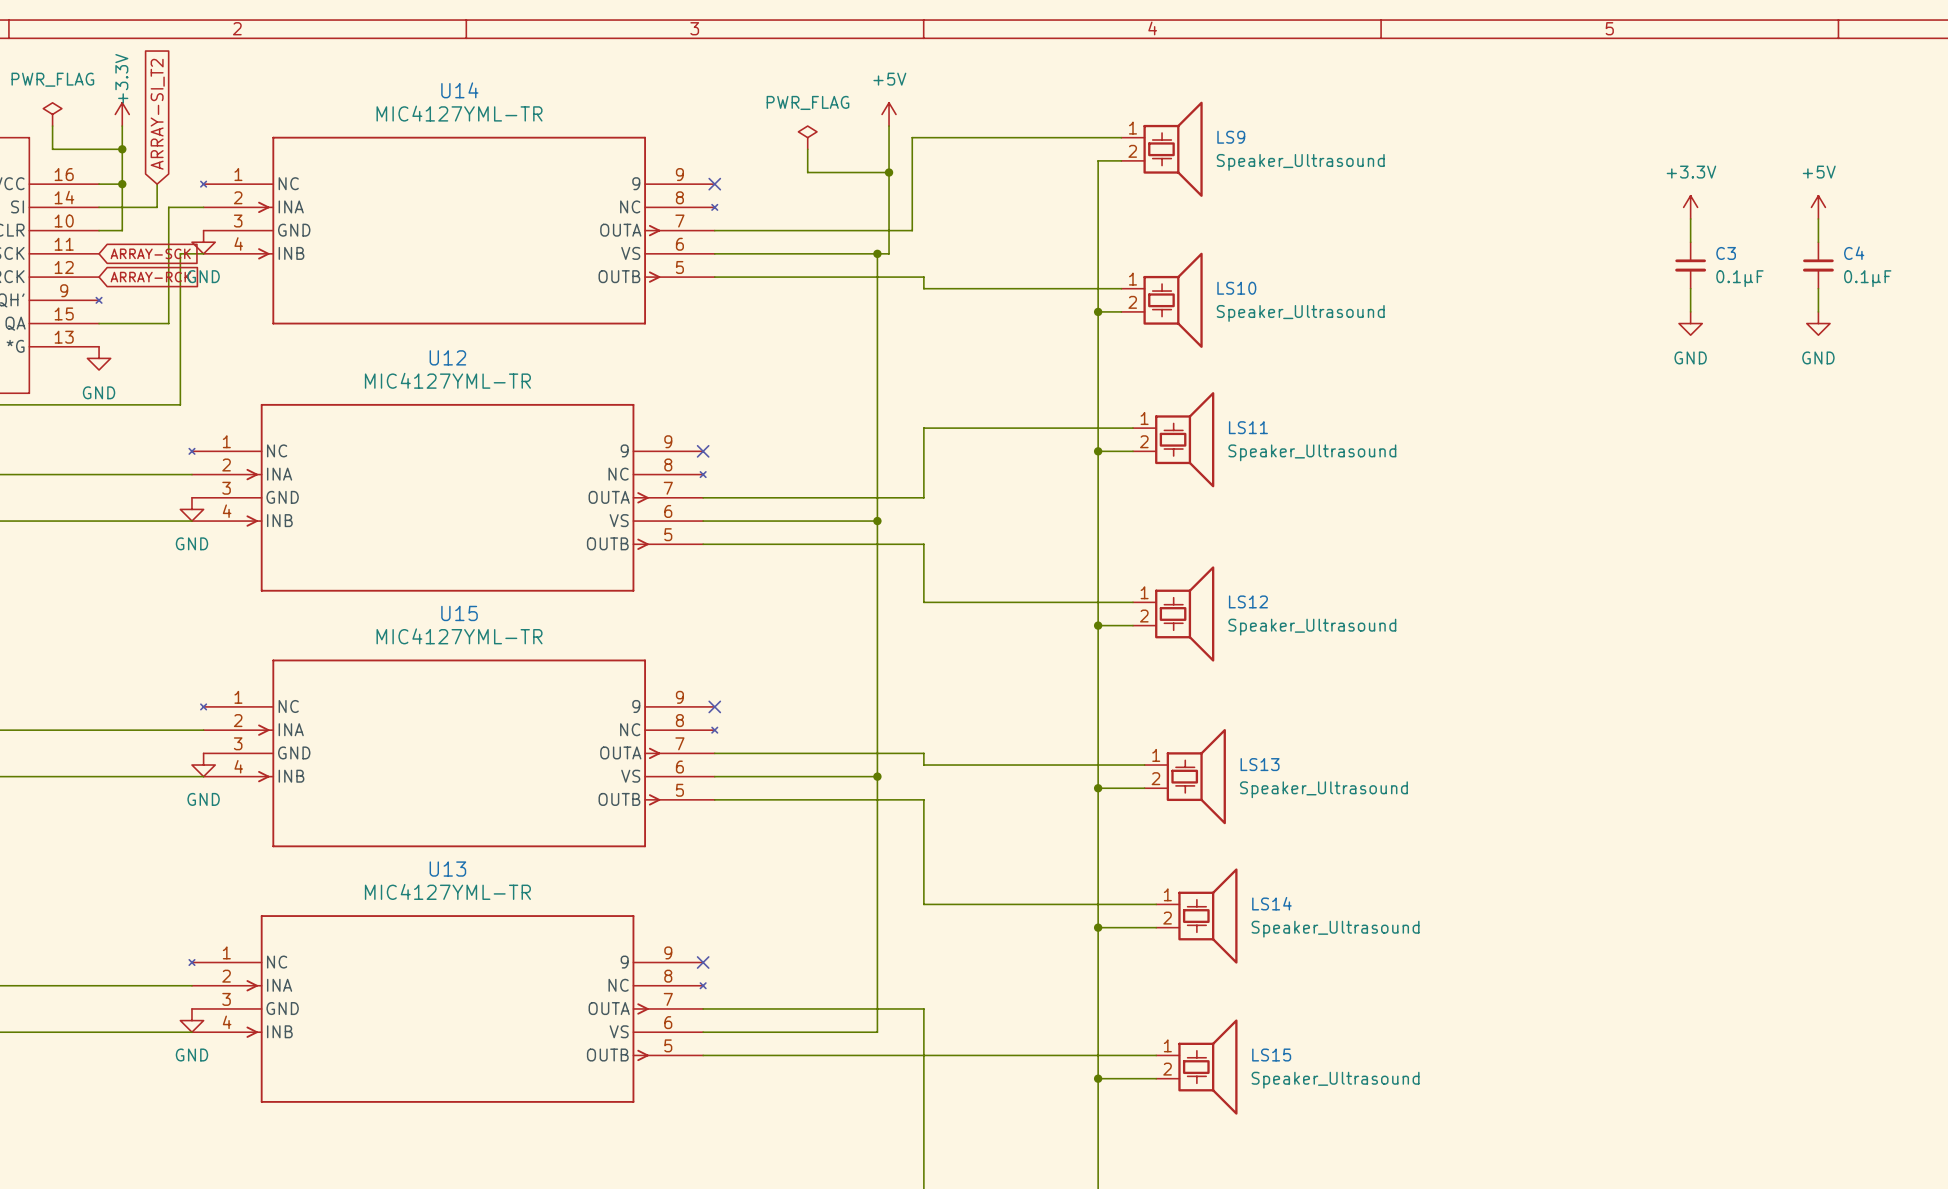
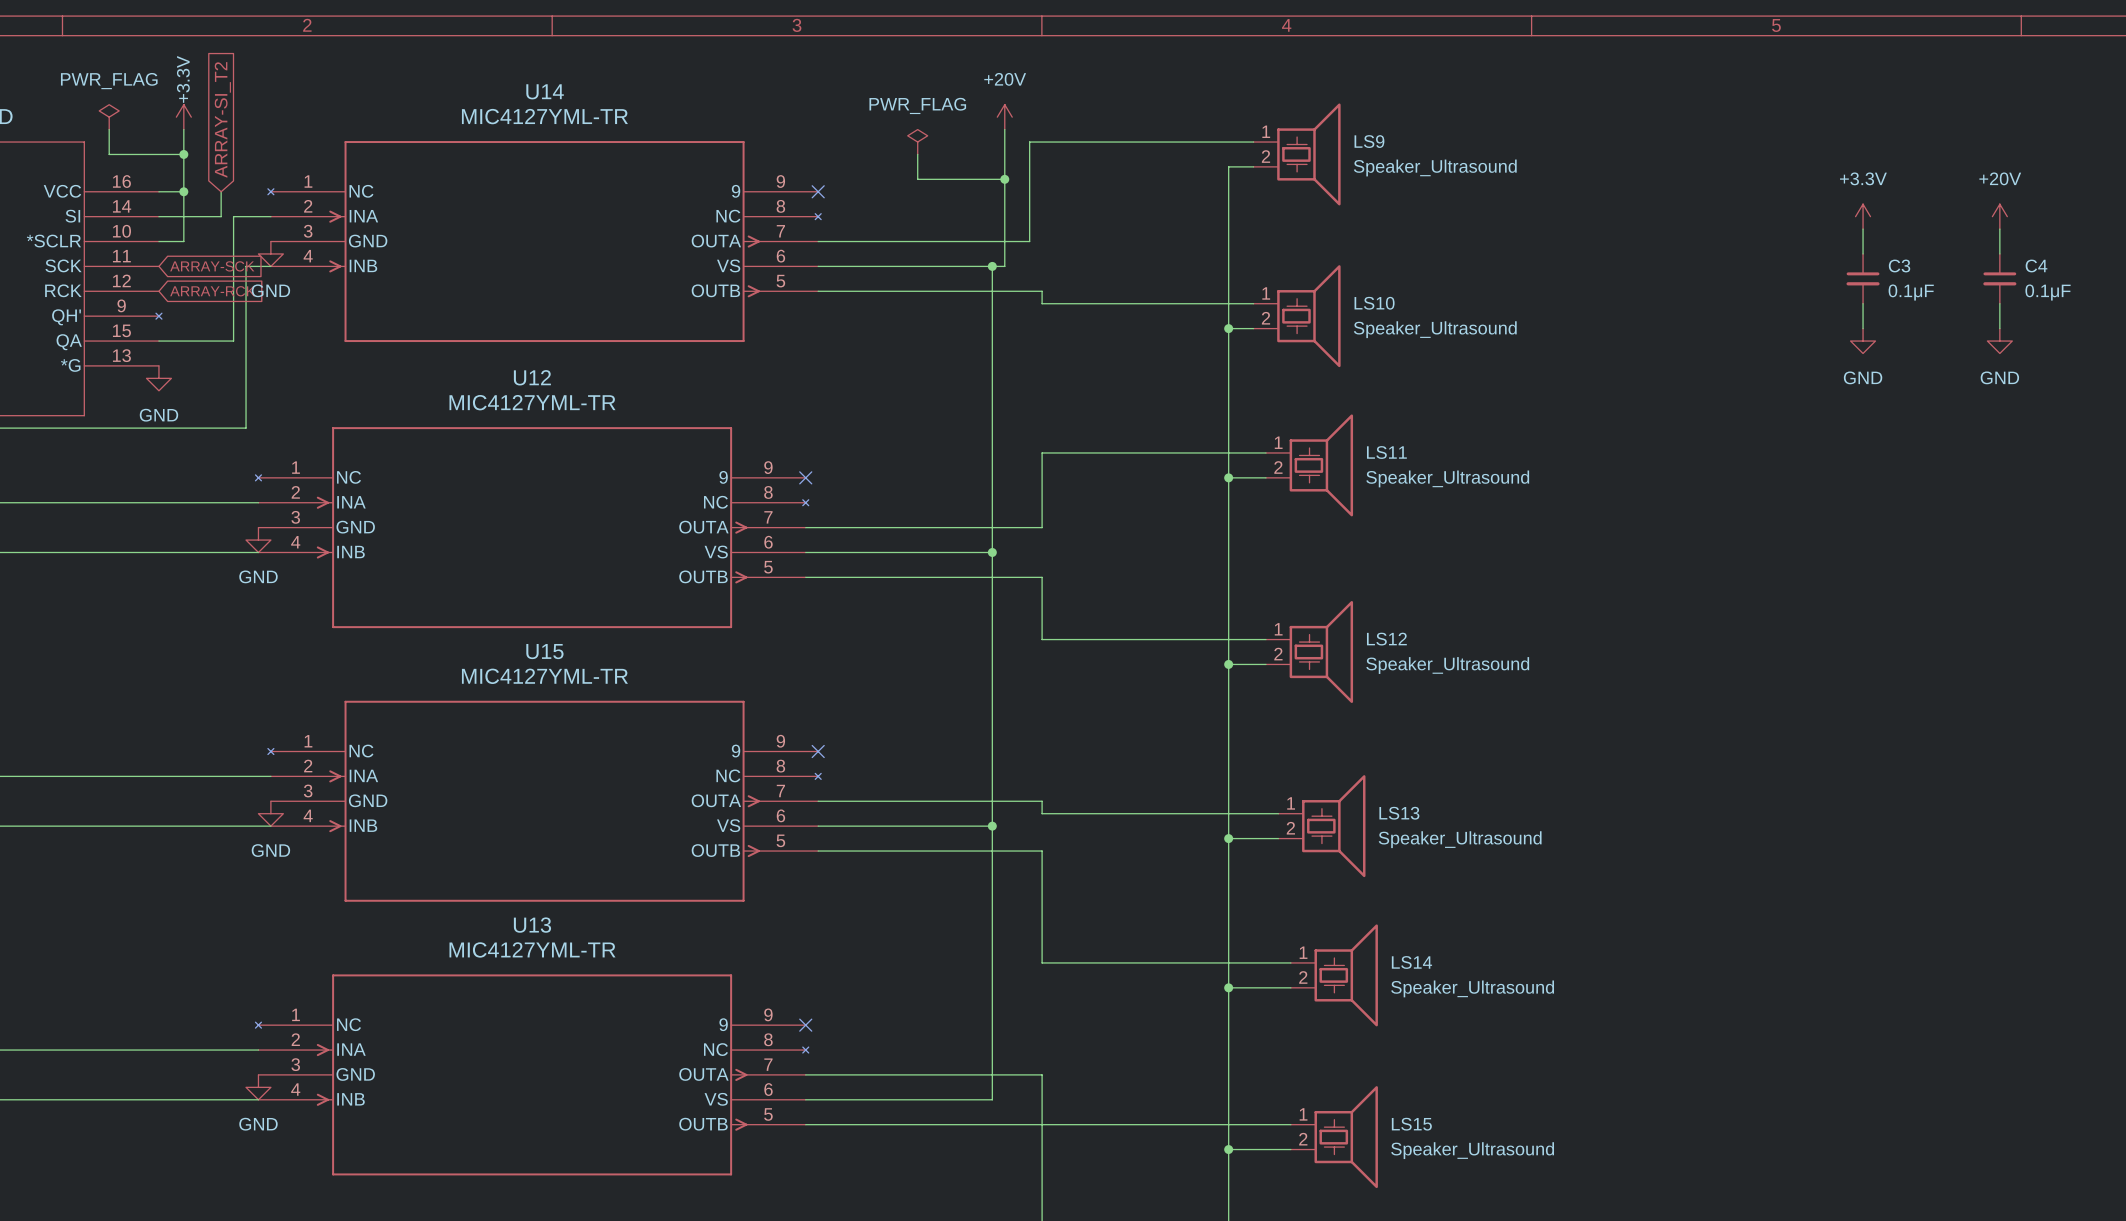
power symbol: +5V (889, 114) -> +20V (1004, 117)
power symbol: +5V (1818, 207) -> +20V (1999, 216)

